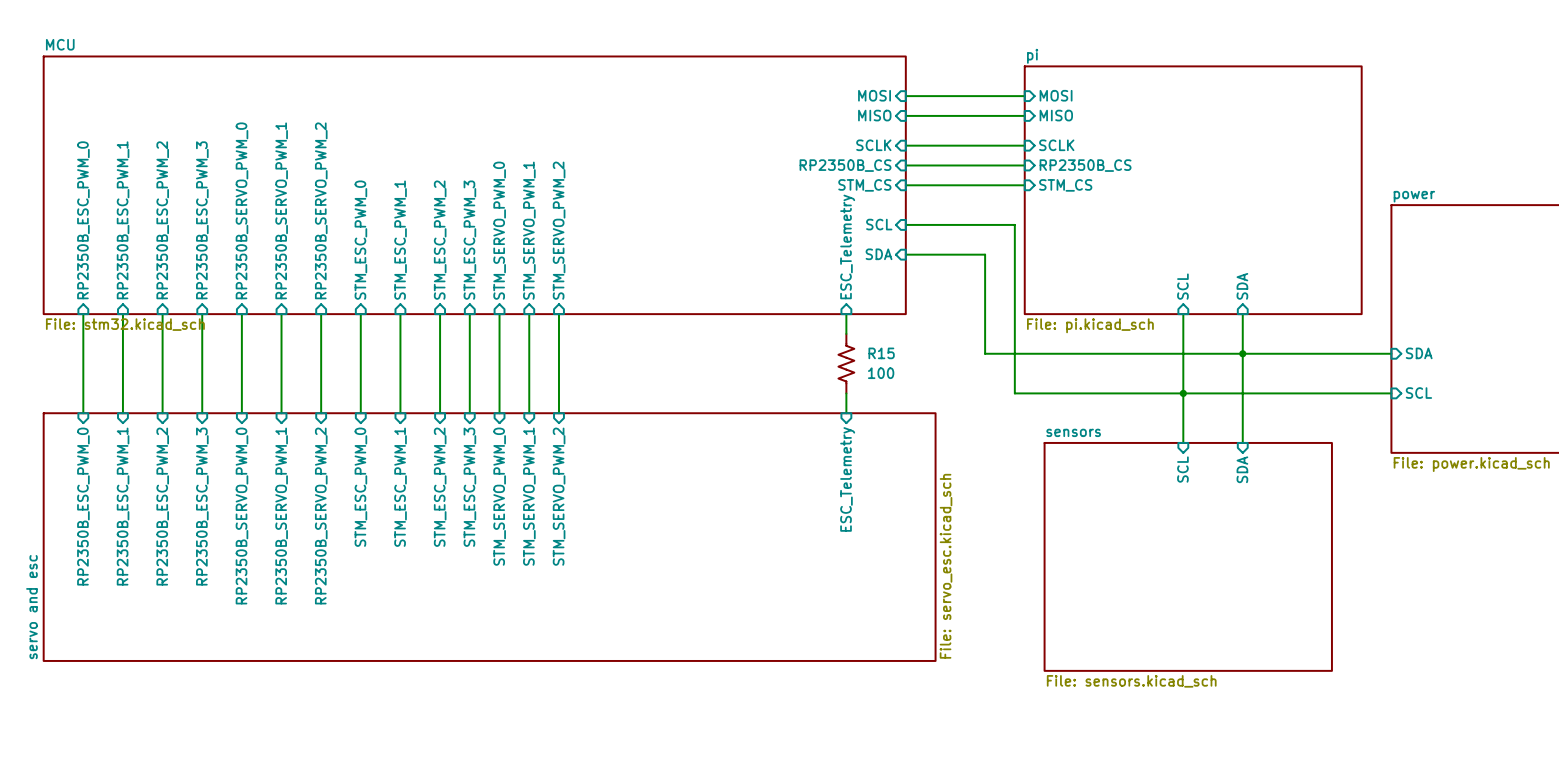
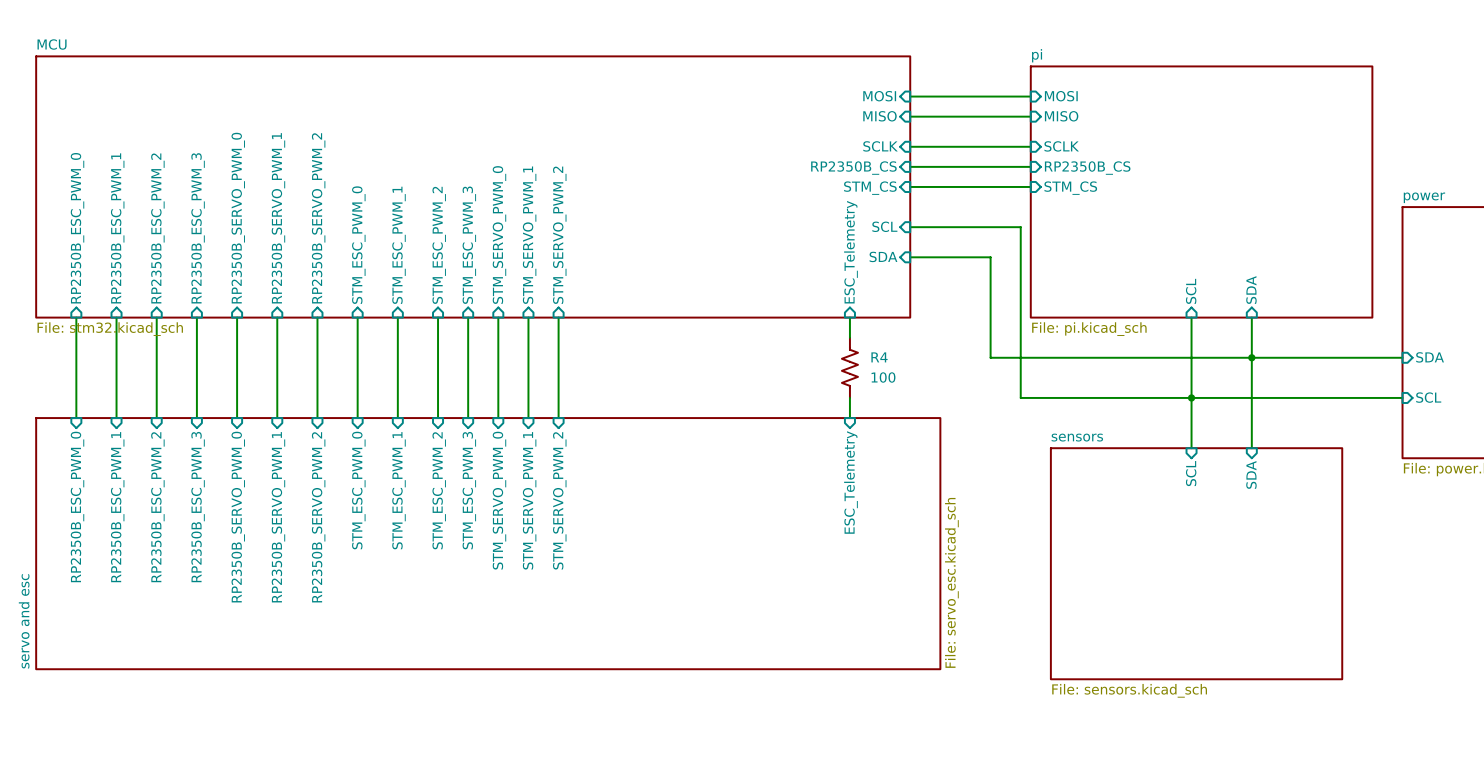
R15 name: R15 (881, 353) -> R4 (879, 357)

